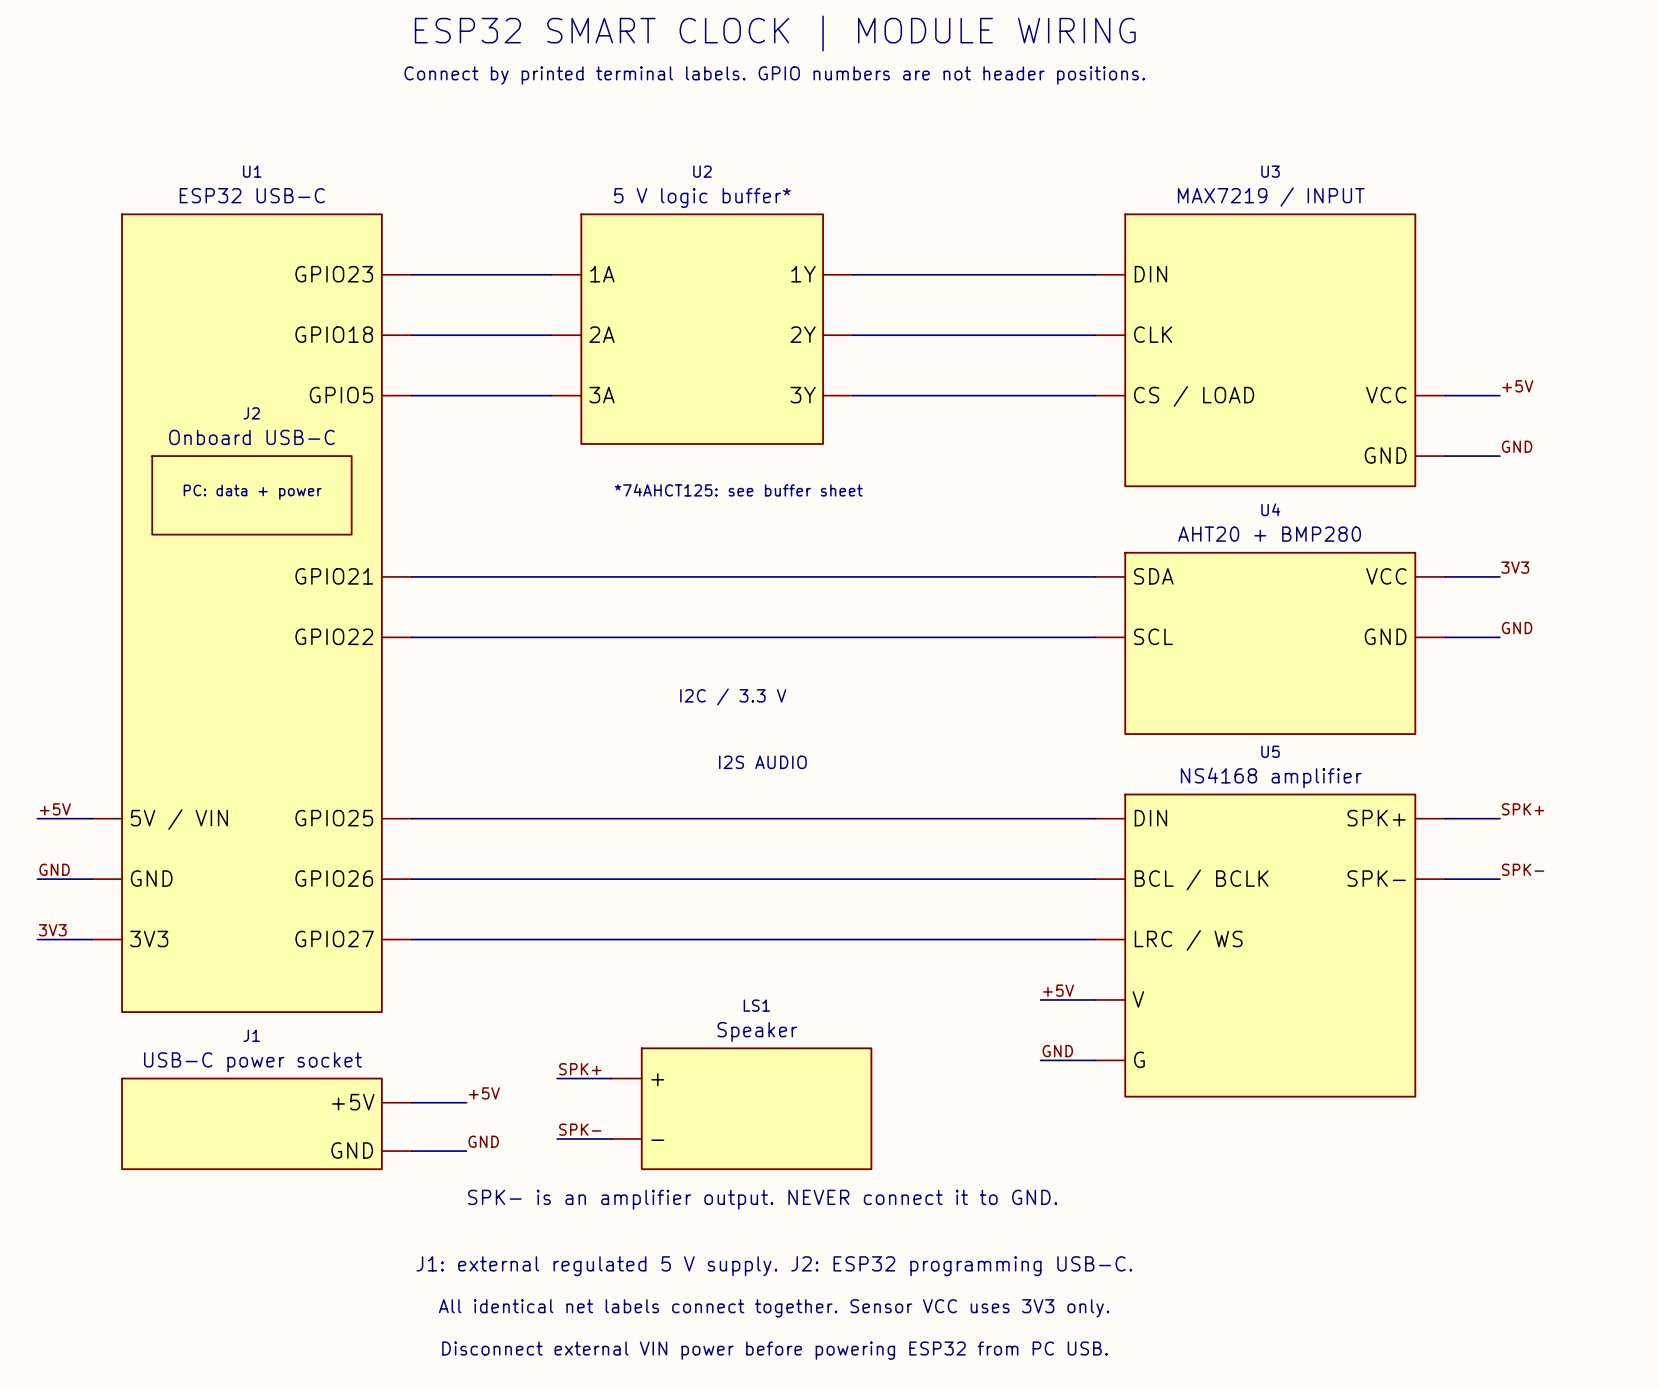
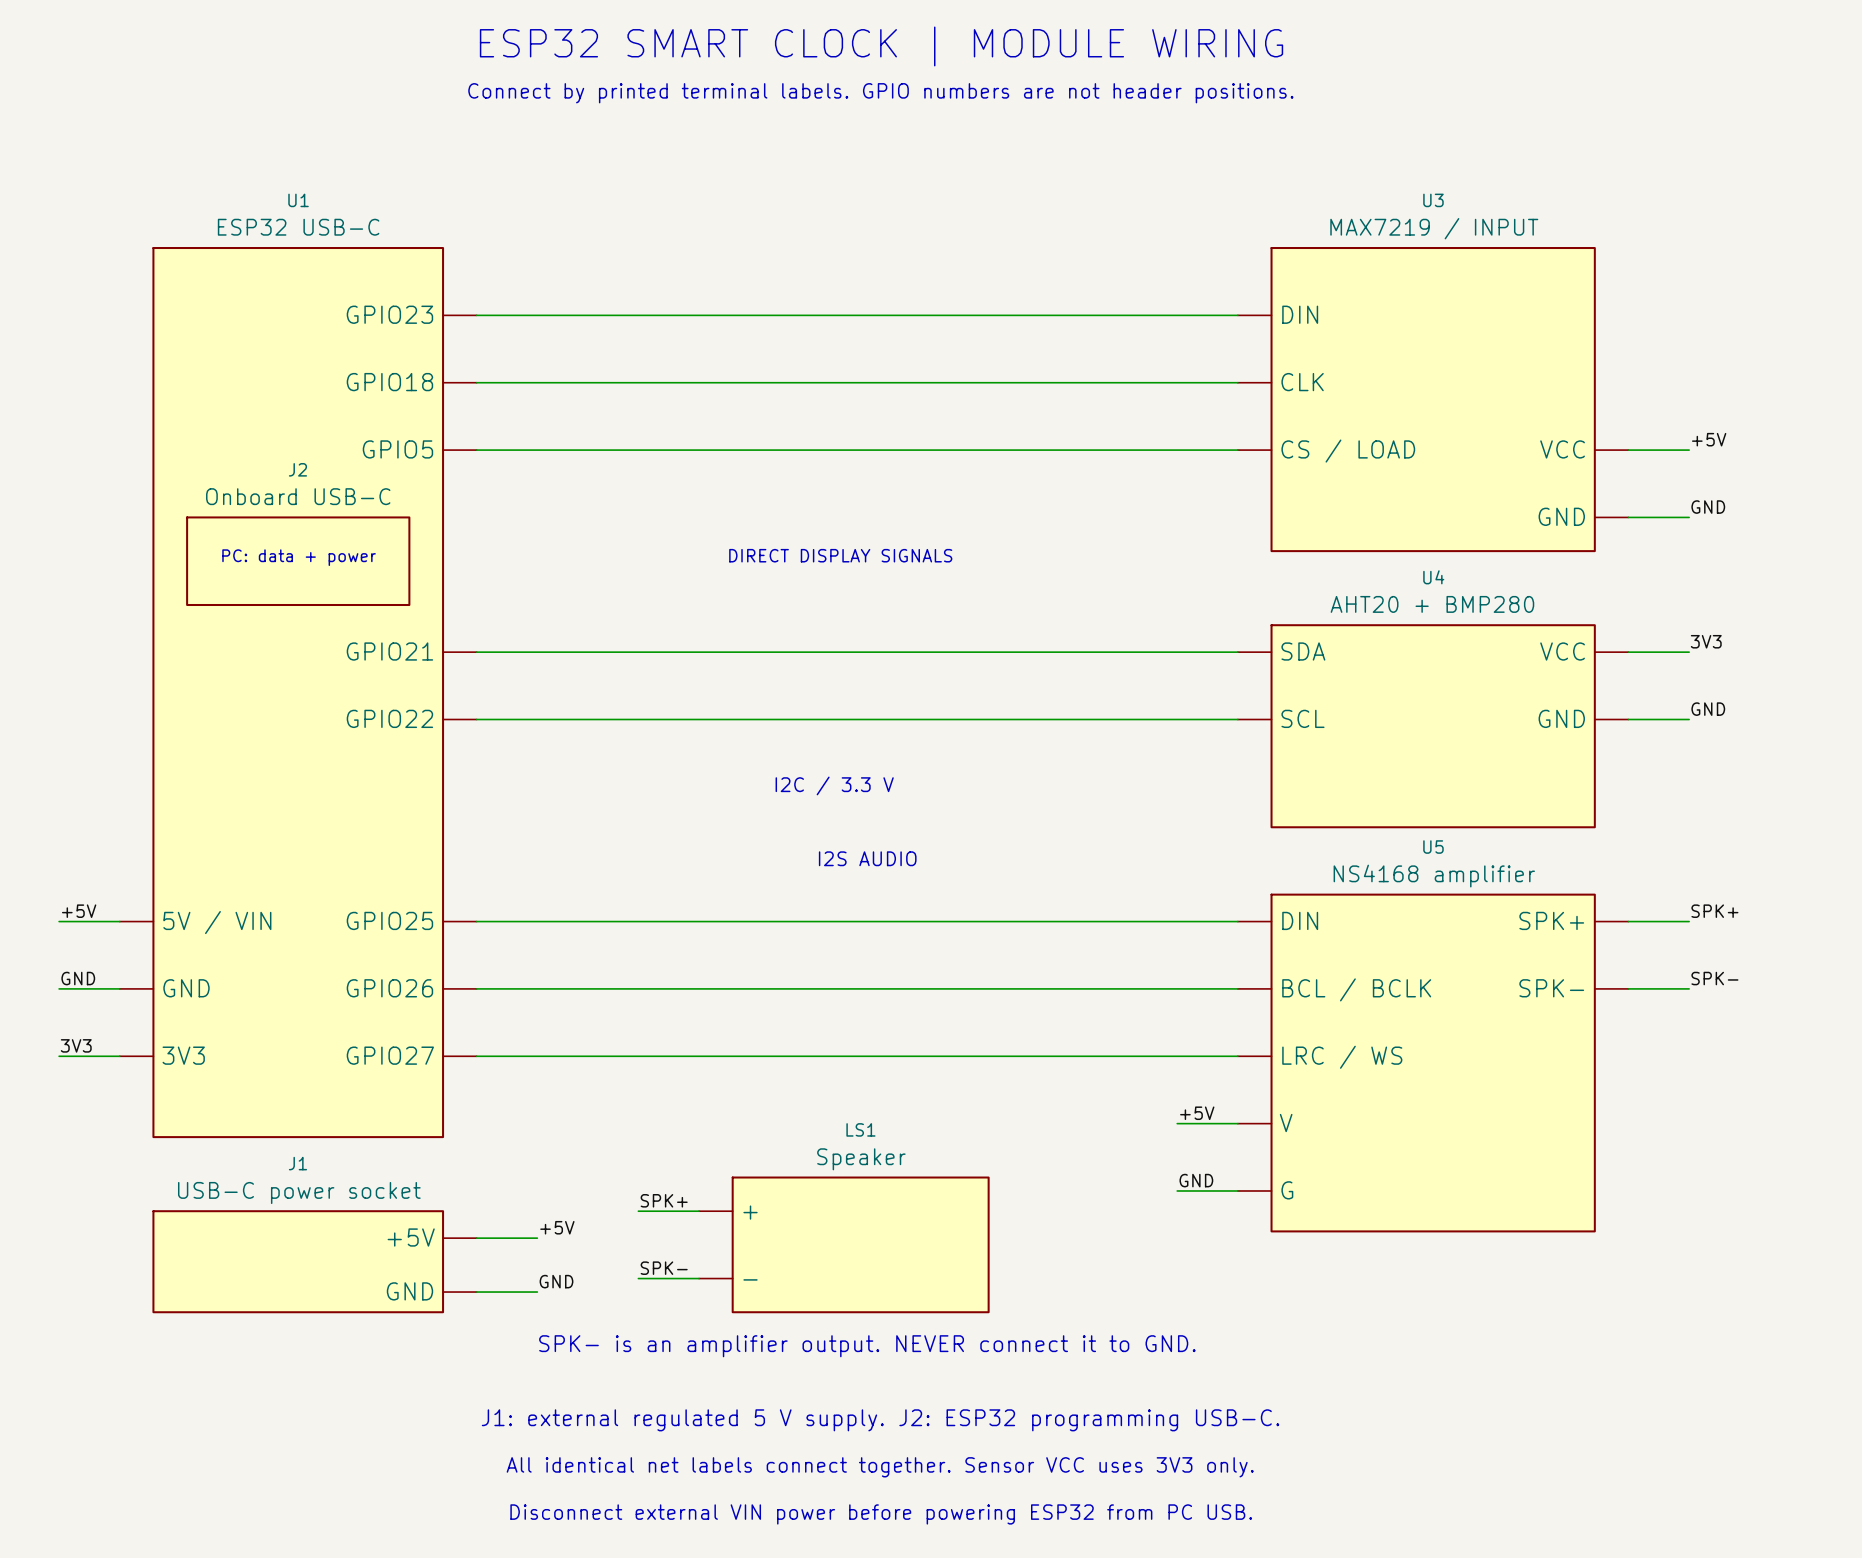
U2: 5 V logic buffer* (702, 329) -> none
text: *74AHCT125: see buffer sheet (738, 490) -> DIRECT DISPLAY SIGNALS (840, 555)

